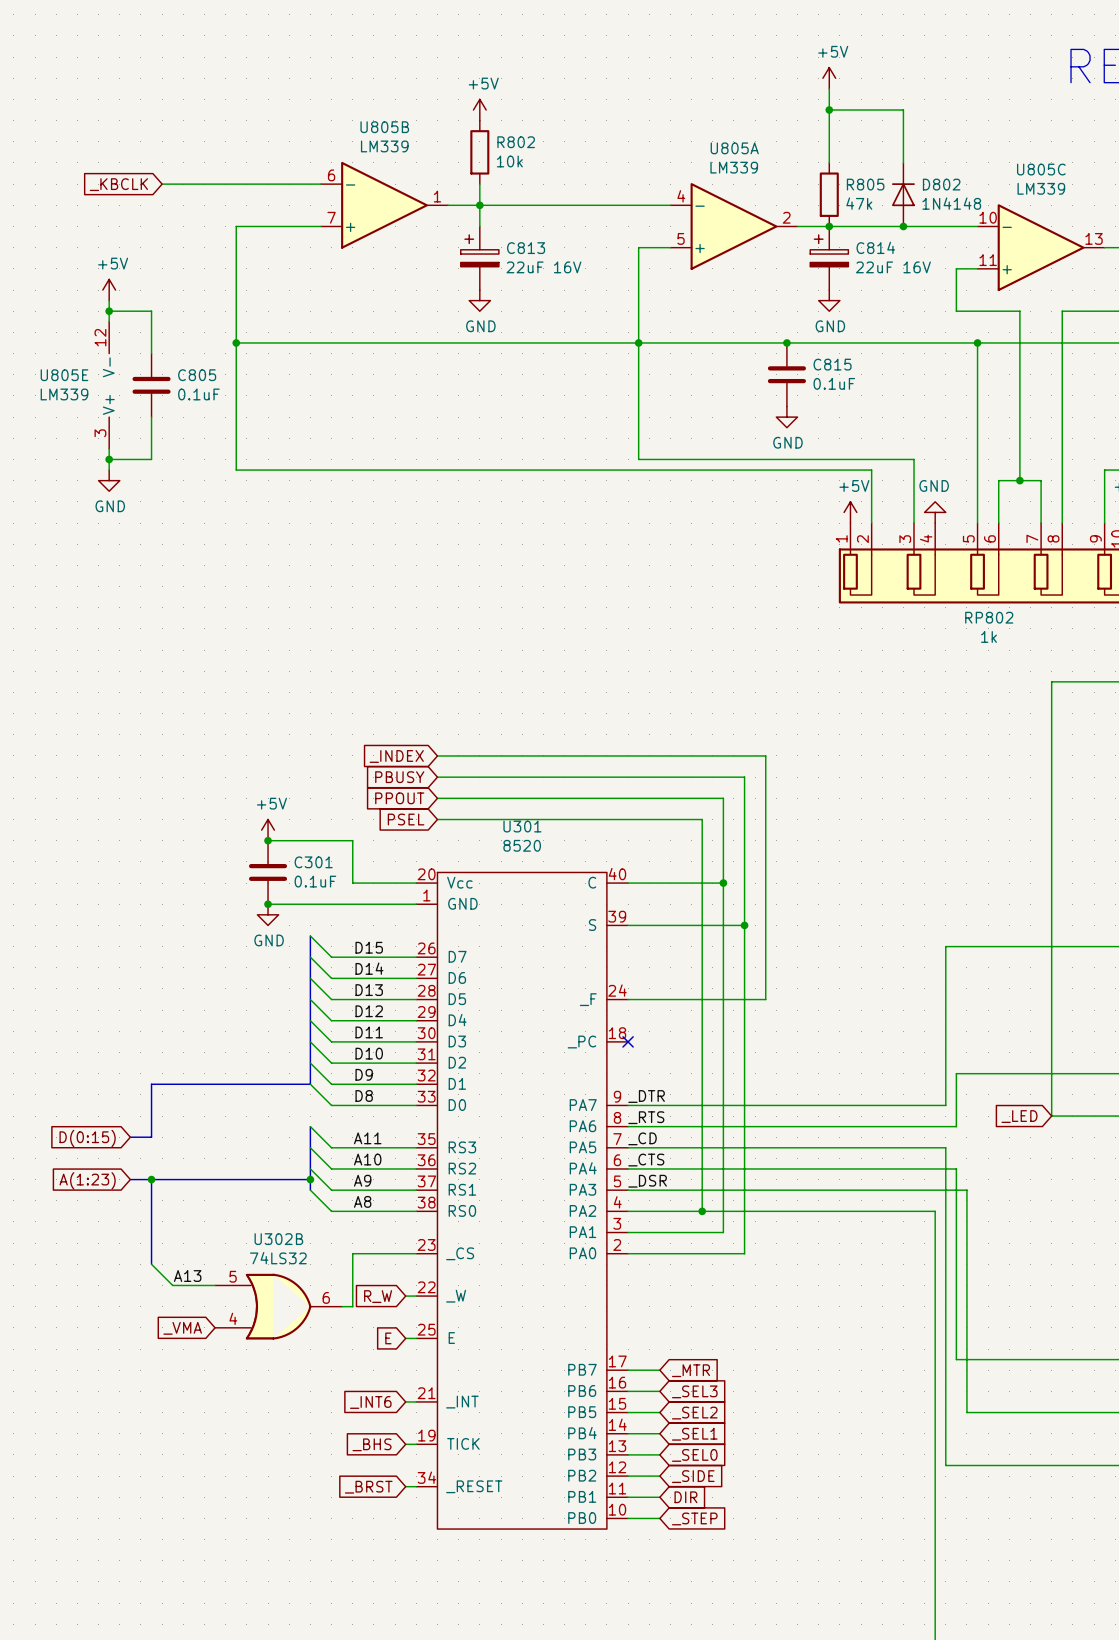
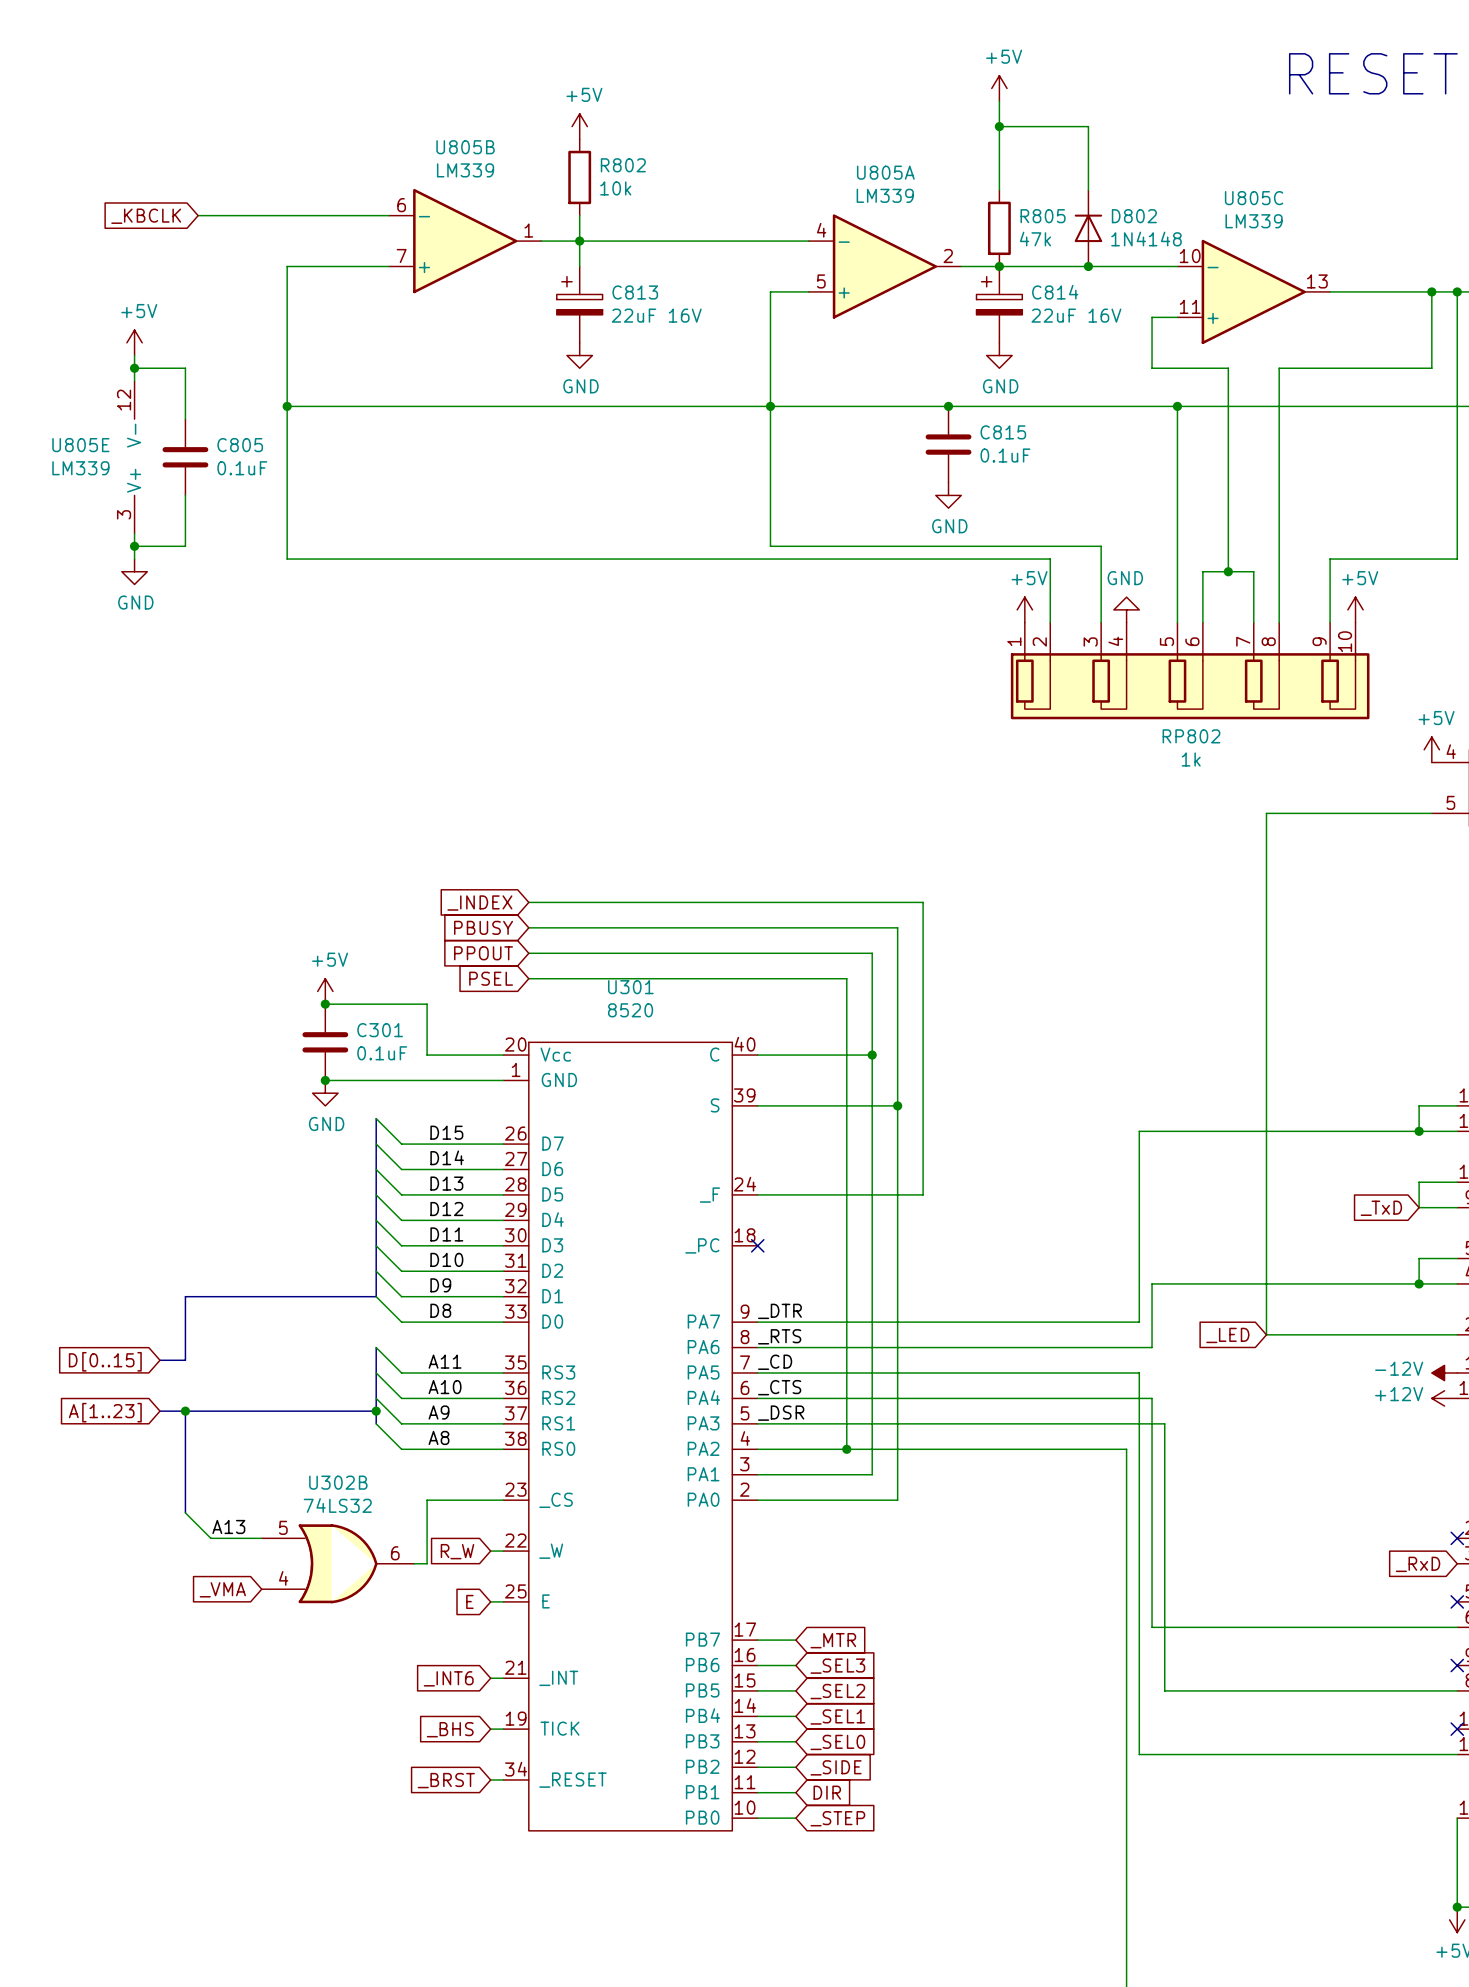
global label: D(0:15) (87, 1138) -> D[0..15] (105, 1361)
global label: A(1:23) (87, 1180) -> A[1..23] (105, 1412)

